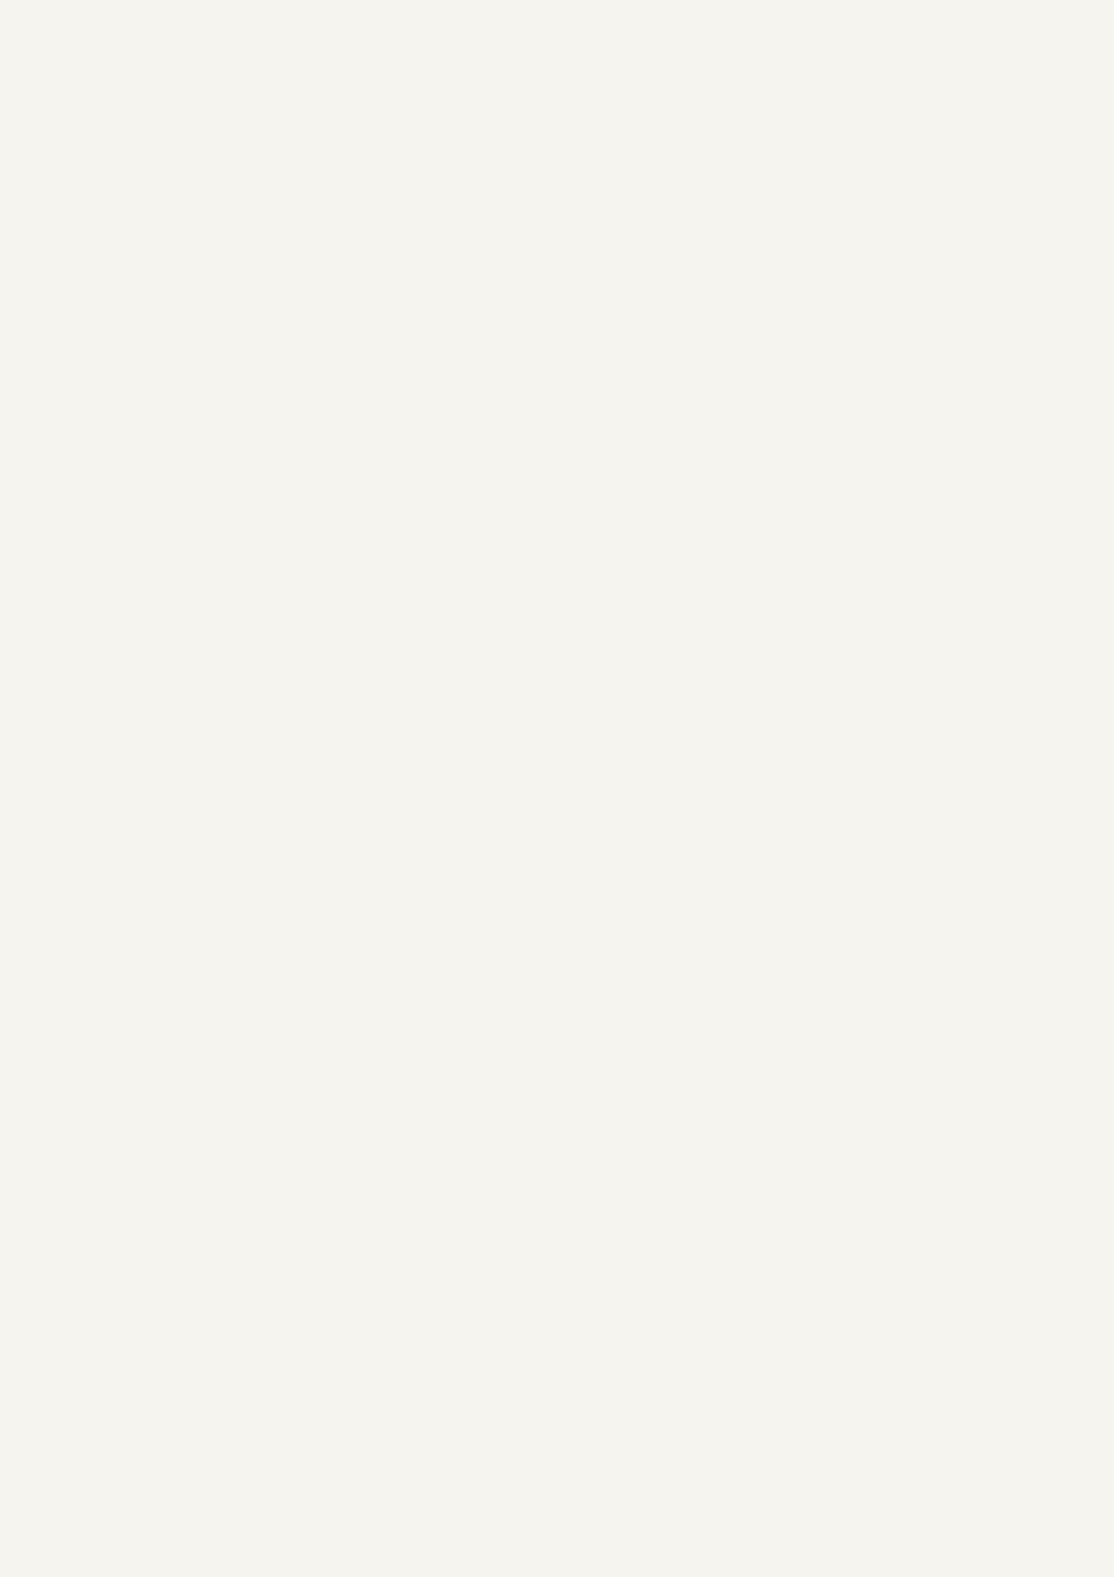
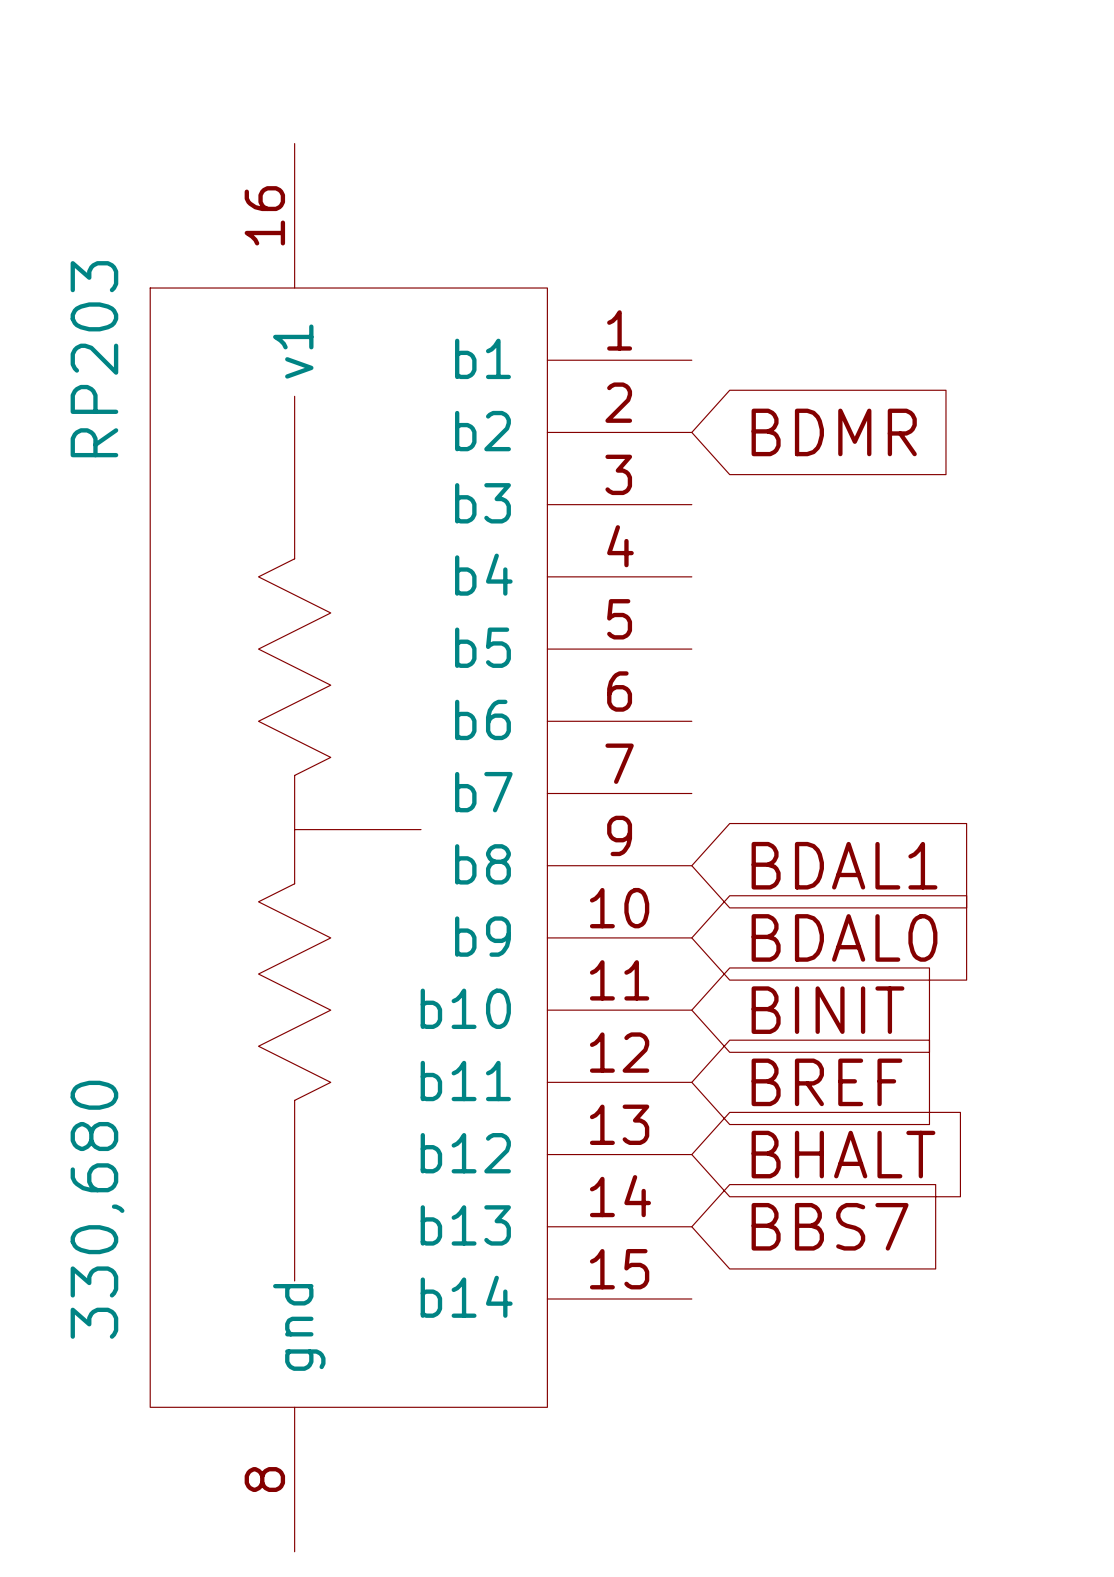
global label: none -> BDMR (834, 432)
RP203: none -> 330,680 (421, 847)
global label: none -> BDAL1 (844, 865)
global label: none -> BDAL0 (844, 937)
global label: none -> BINIT (827, 1010)
global label: none -> BREF (826, 1082)
global label: none -> BHALT (843, 1154)
global label: none -> BBS7 (830, 1226)

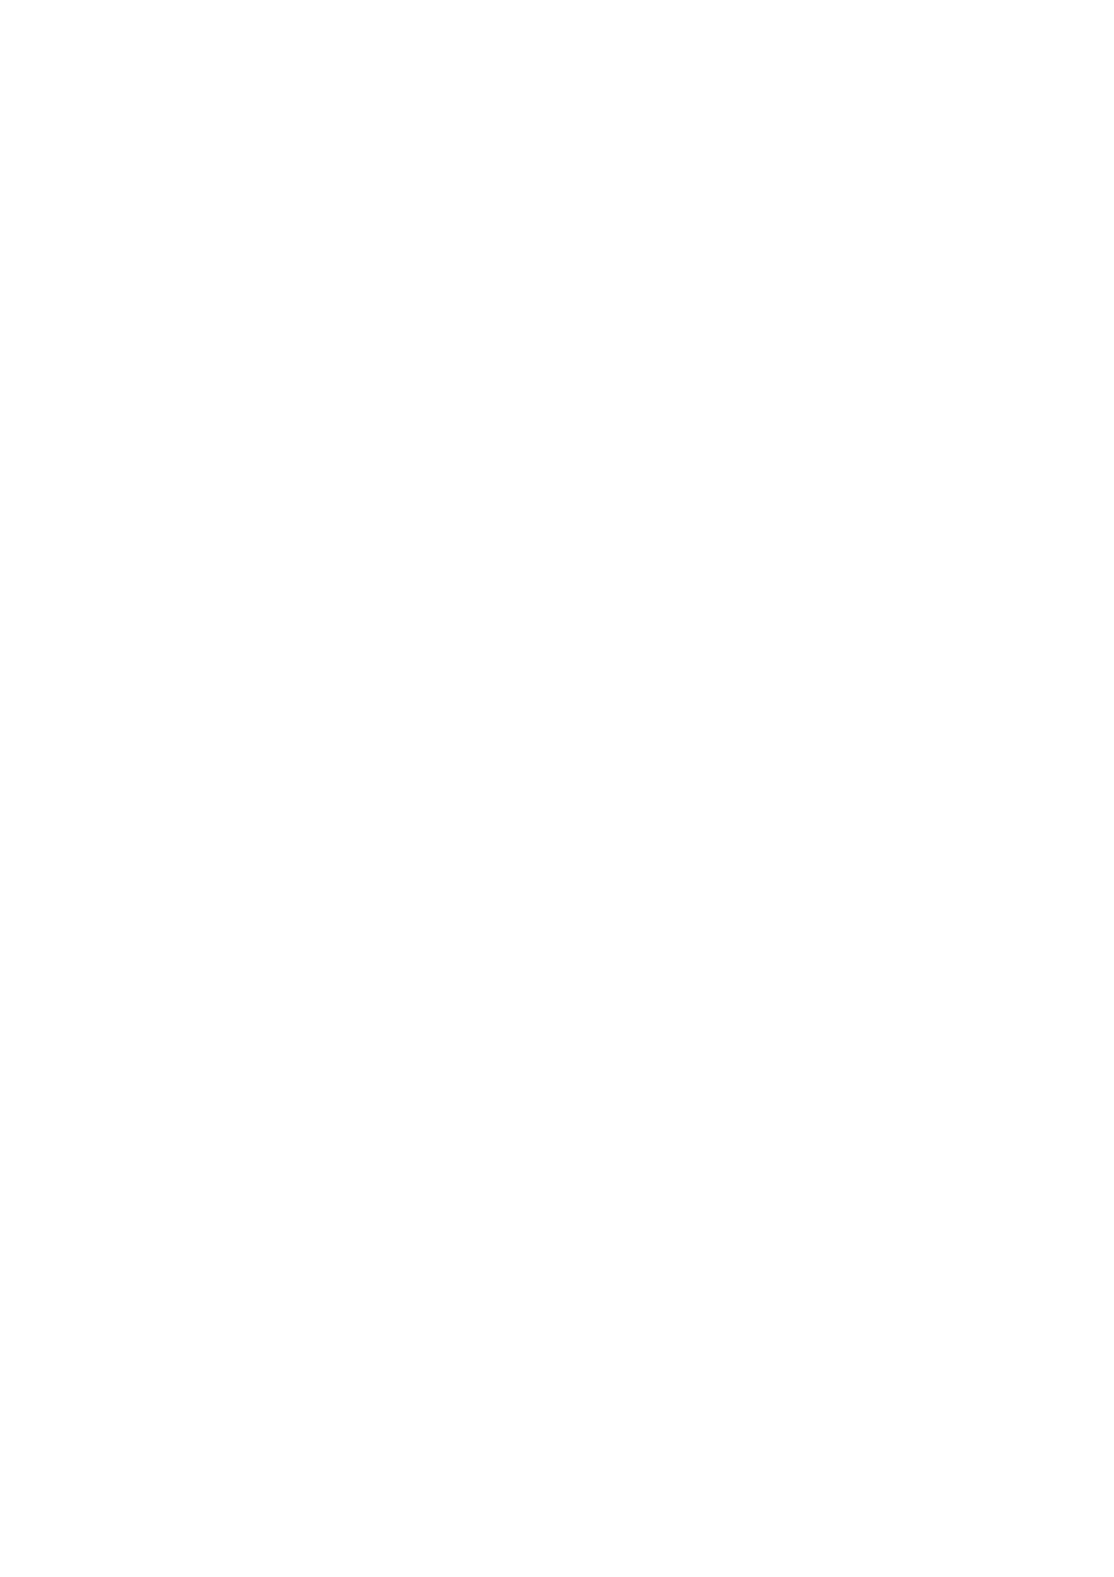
global label: BDMR (834, 432) -> none
RP203: 330,680 (421, 847) -> none
global label: BDAL1 (844, 865) -> none
global label: BDAL0 (844, 937) -> none
global label: BINIT (827, 1010) -> none
global label: BREF (826, 1082) -> none
global label: BHALT (843, 1154) -> none
global label: BBS7 (830, 1226) -> none

